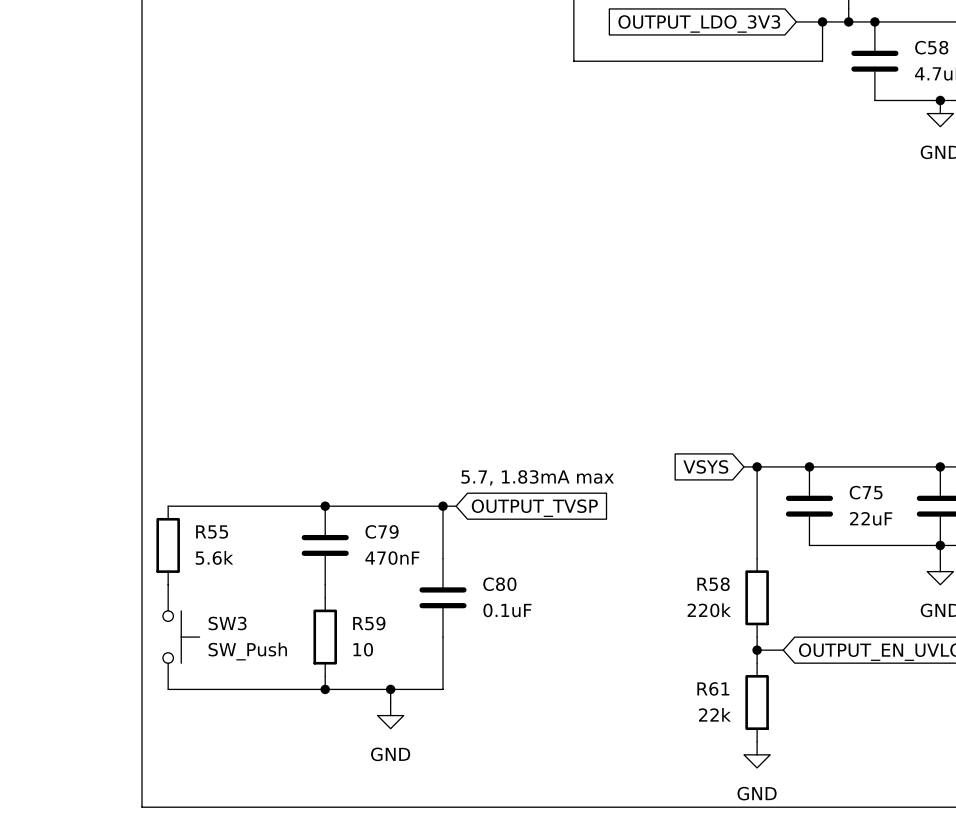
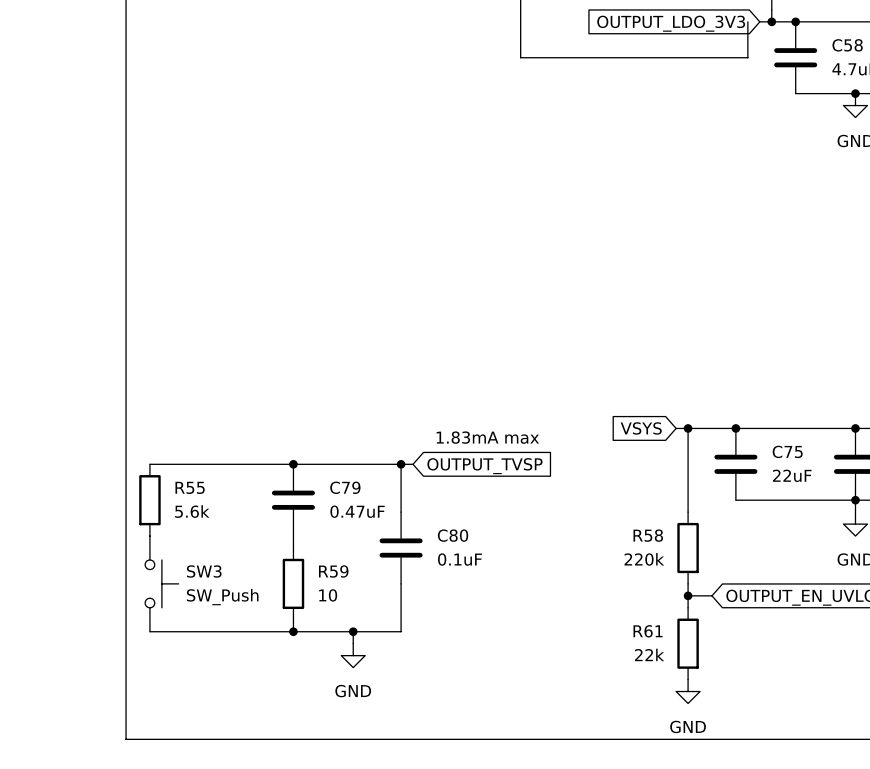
wire: (796, 21) (835, 21) -> none
junction: (822, 21) -> none
global label position: OUTPUT_LDO_3V3 (699, 23) -> OUTPUT_LDO_3V3 (671, 23)
text: 5.7, 1.83mA max (537, 477) -> 1.83mA max (487, 437)
C79 value: 470nF (392, 558) -> 0.47uF (357, 511)

